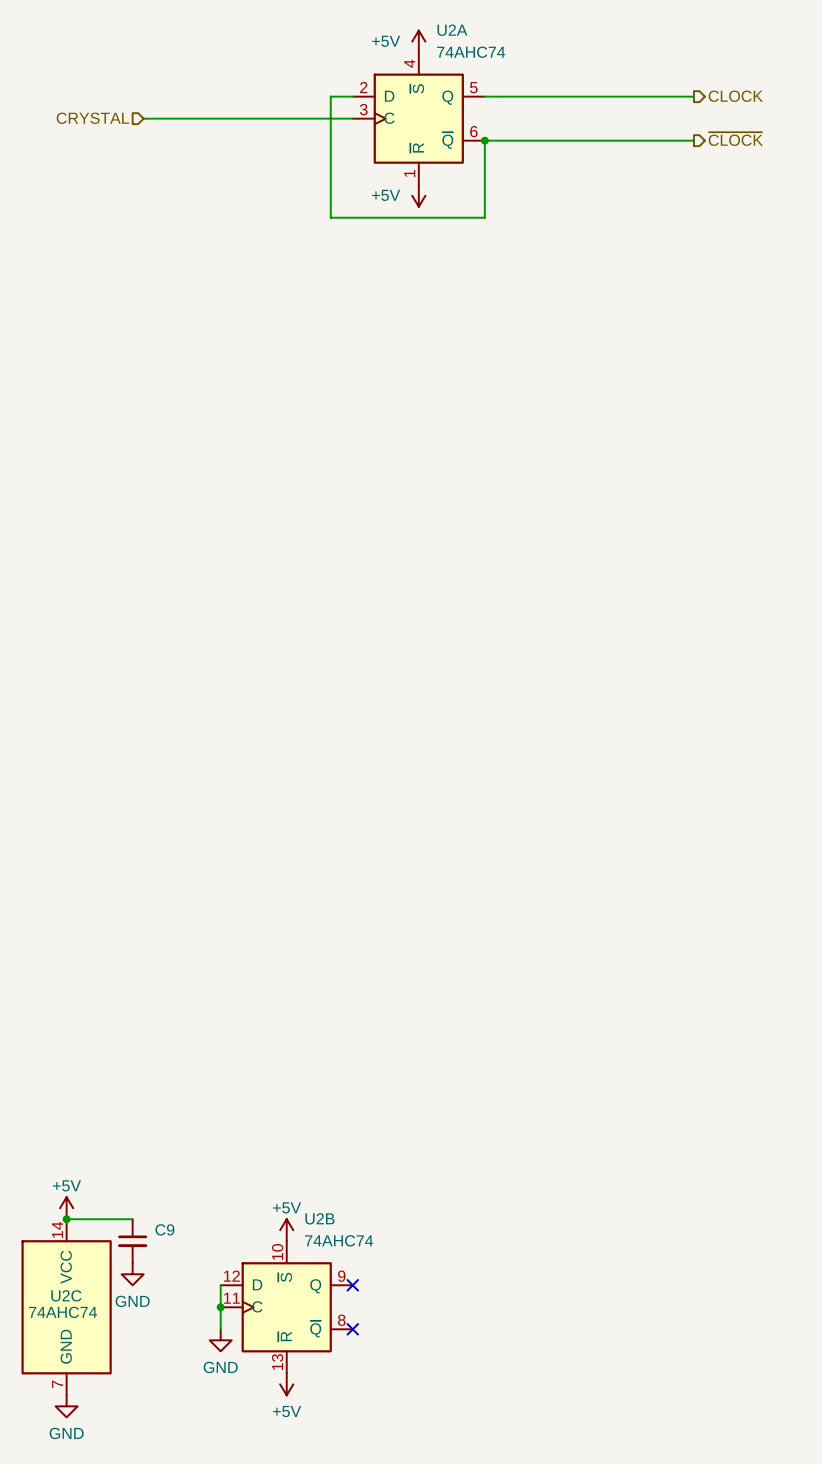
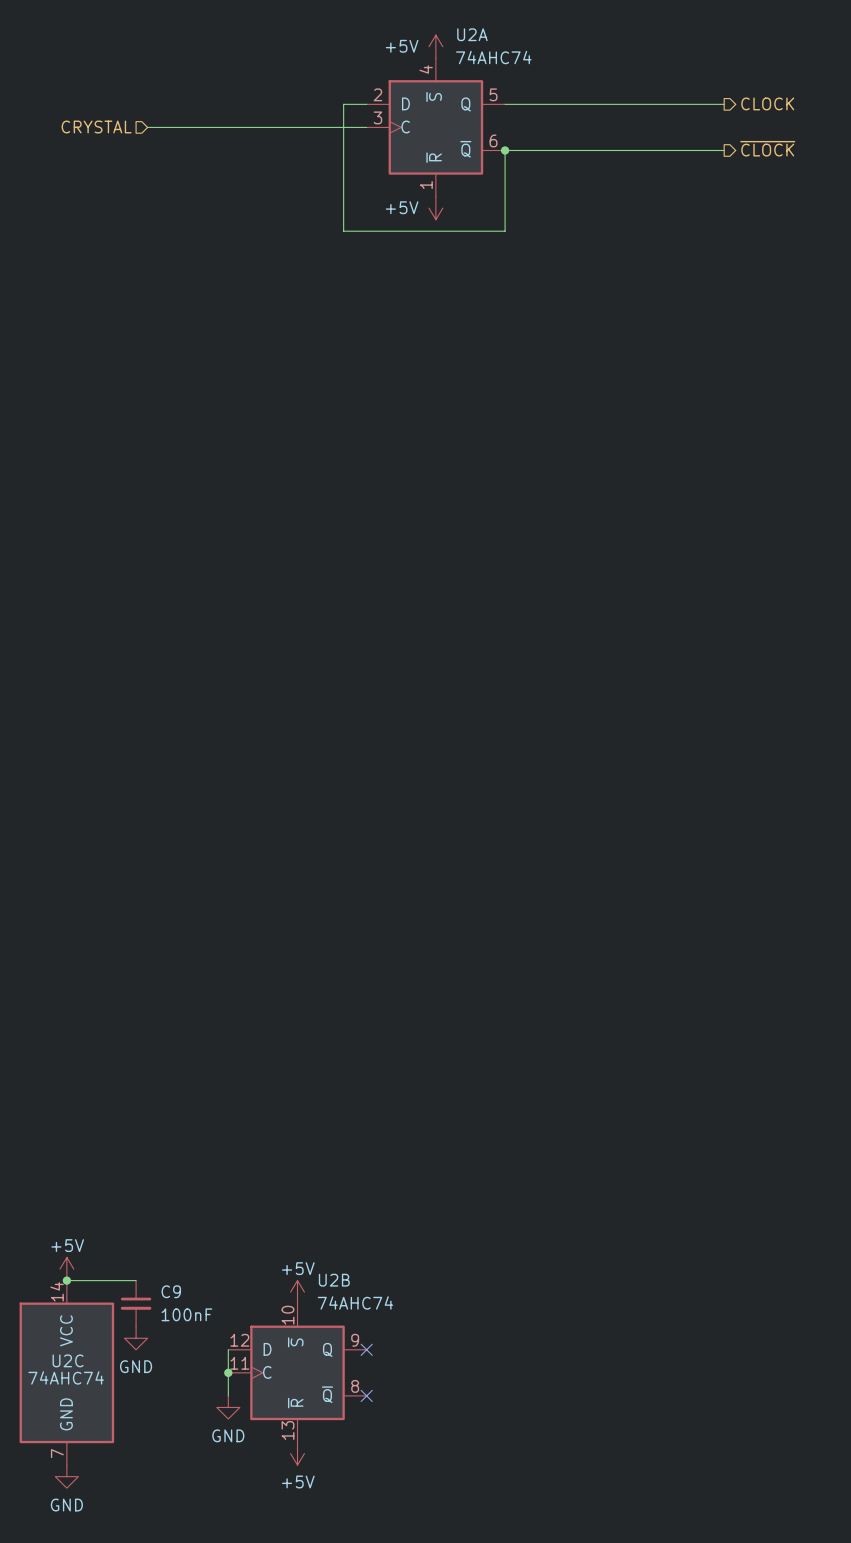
C9 value: none -> 100nF (186, 1314)

